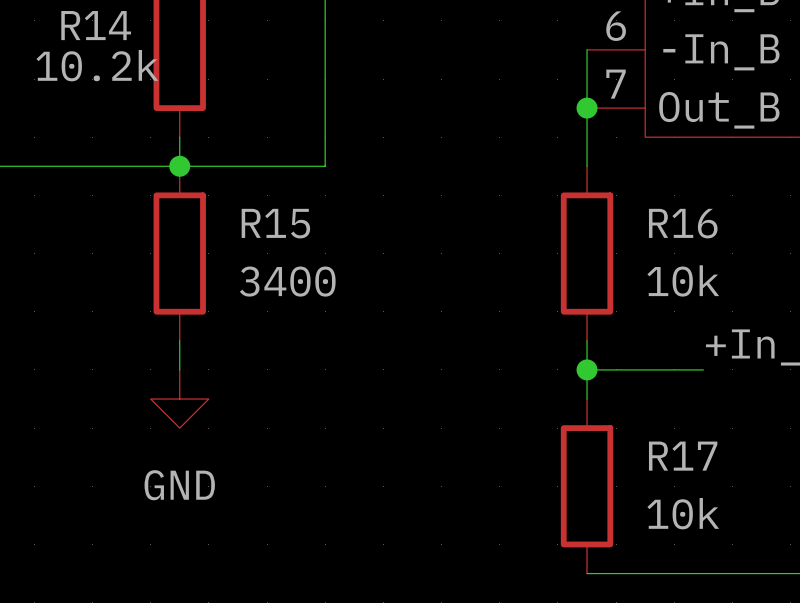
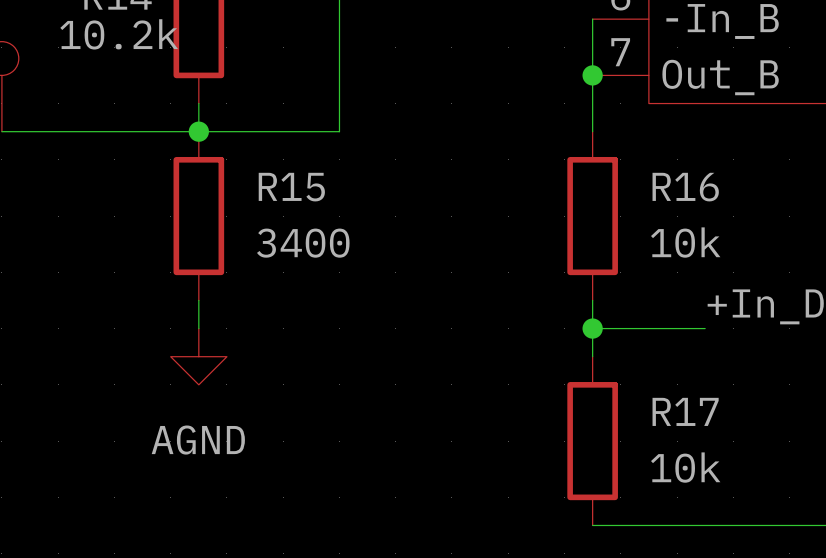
power symbol: GND (179, 399) -> AGND (198, 356)

